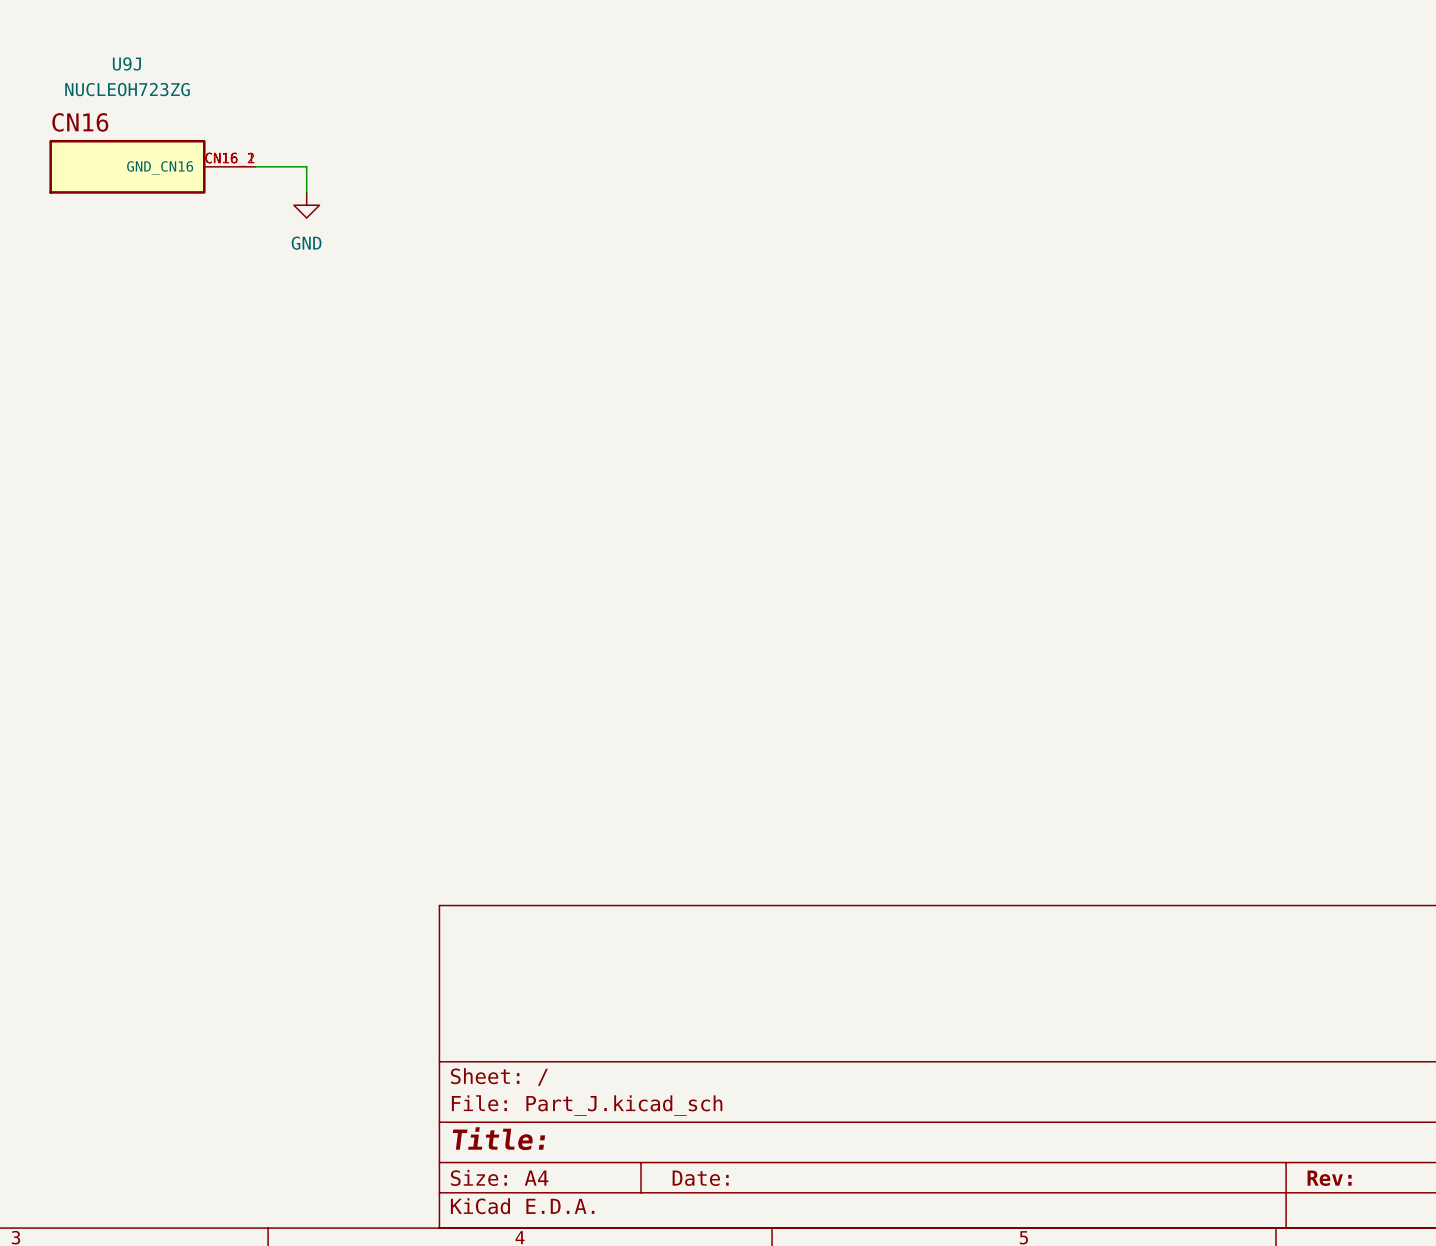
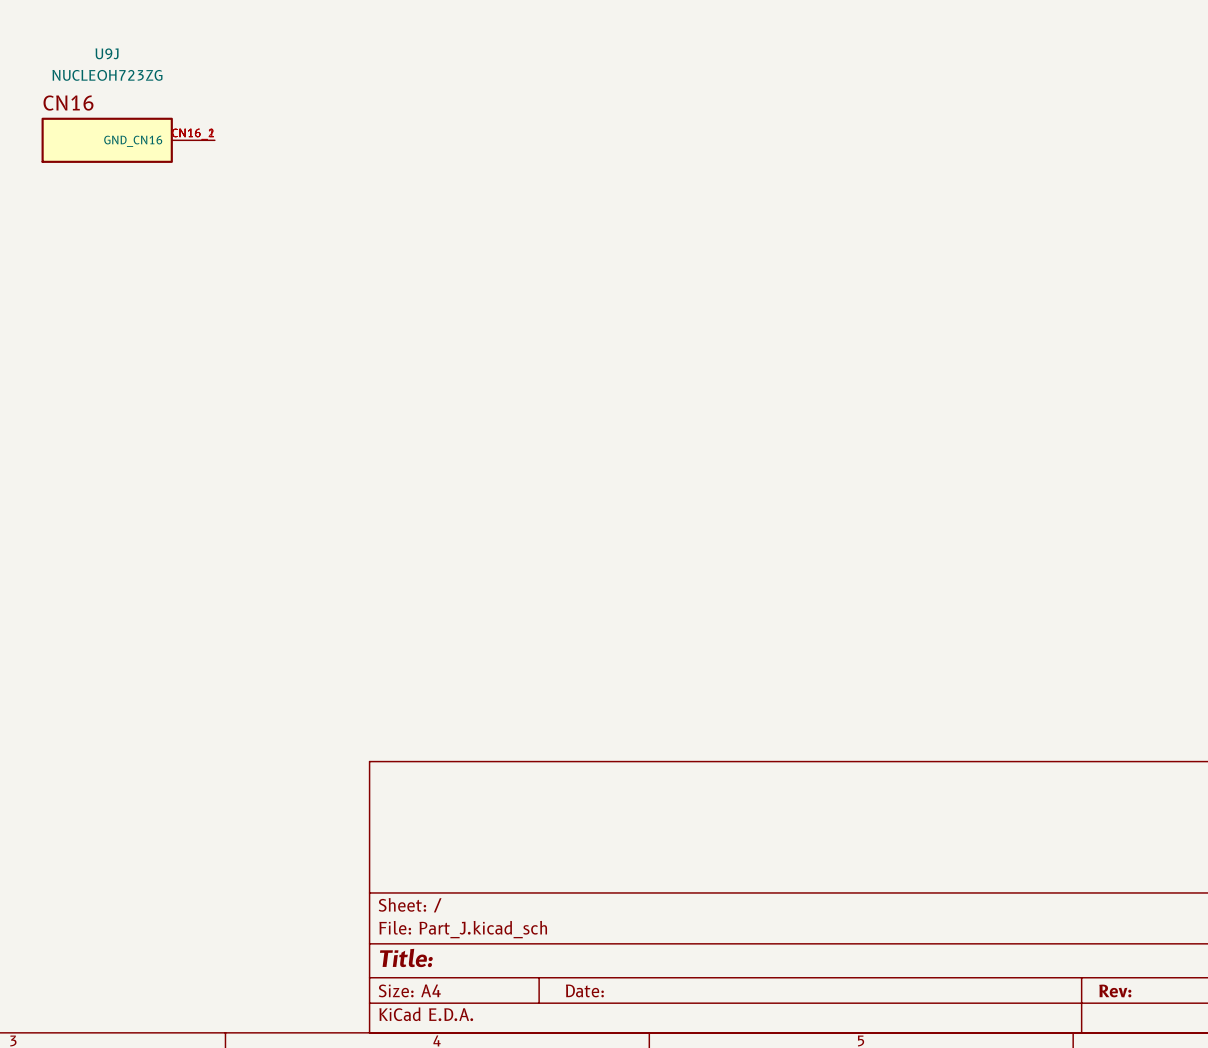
wire: (255, 166) (306, 166) (306, 192) -> none
power symbol: GND (306, 205) -> none

